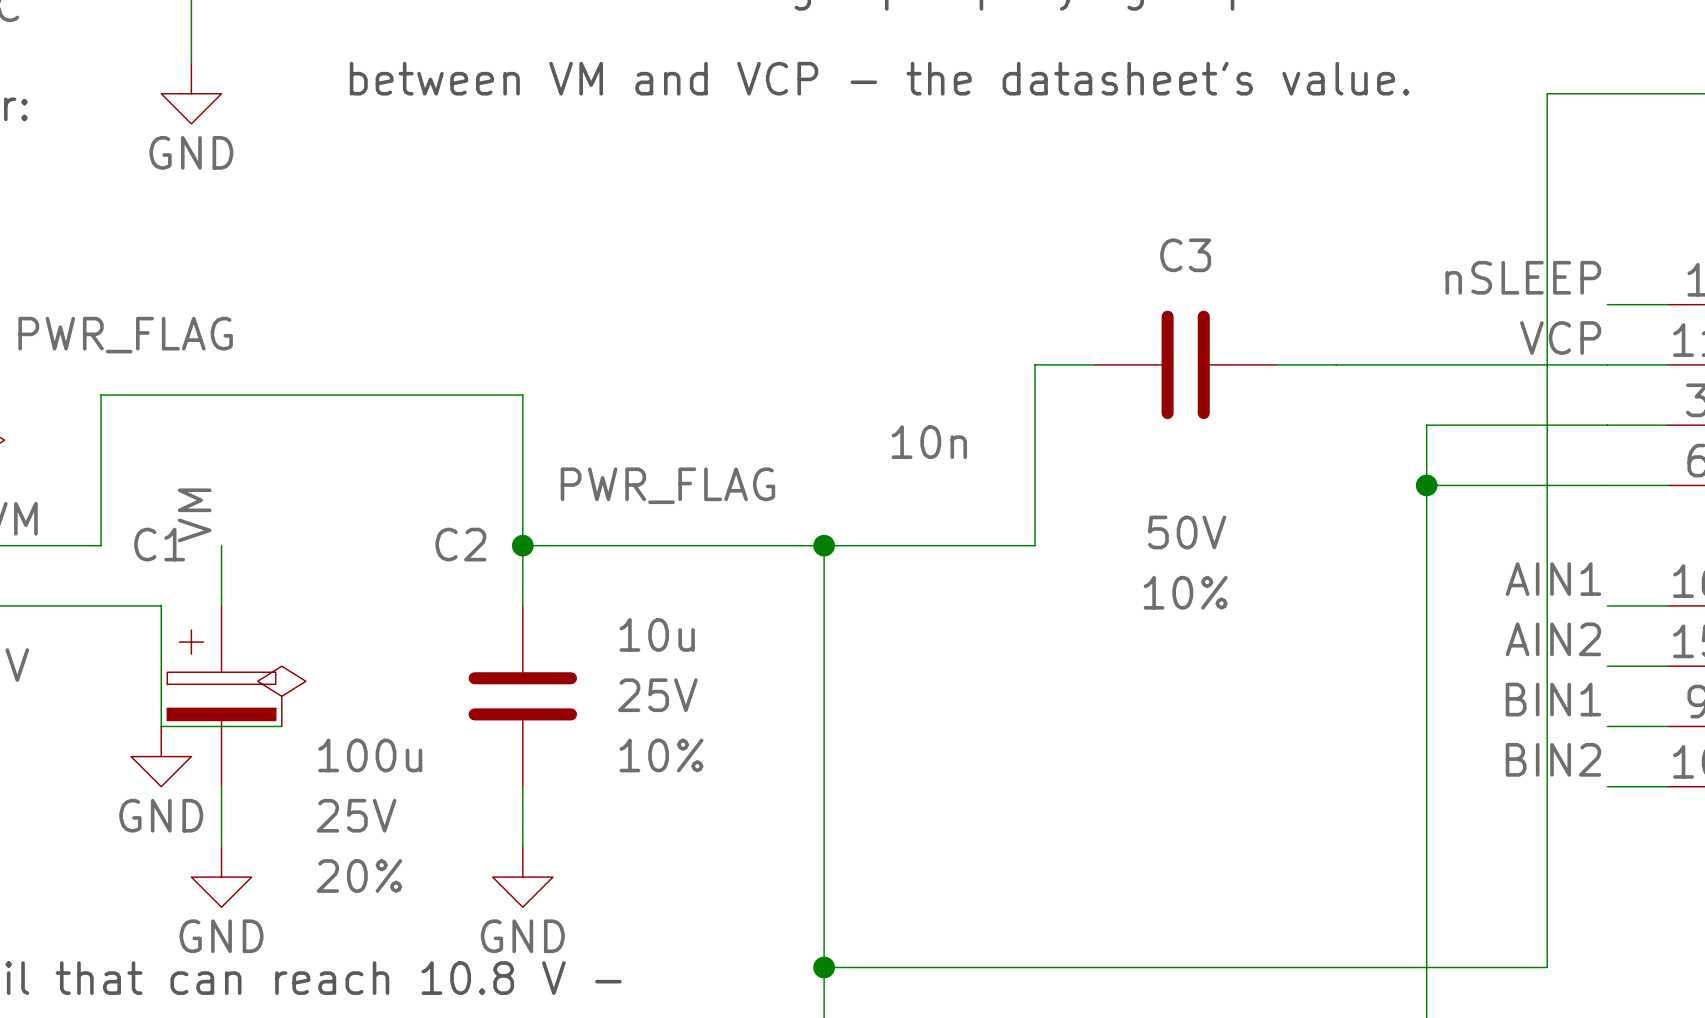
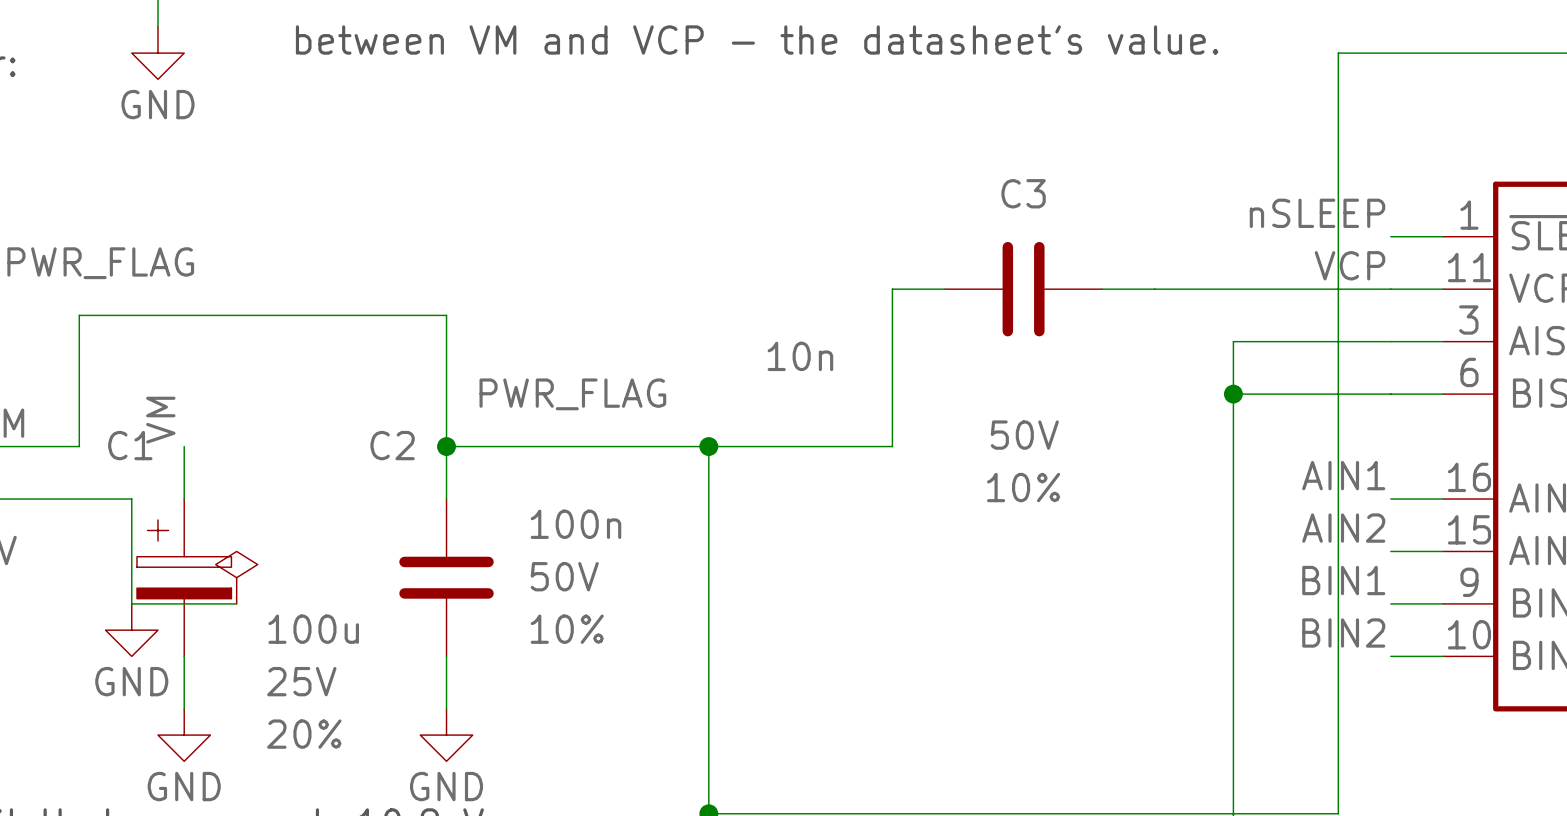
C2 value: 10u (657, 634) -> 100n (575, 524)
C2 text: 25V (657, 695) -> 50V (564, 576)

